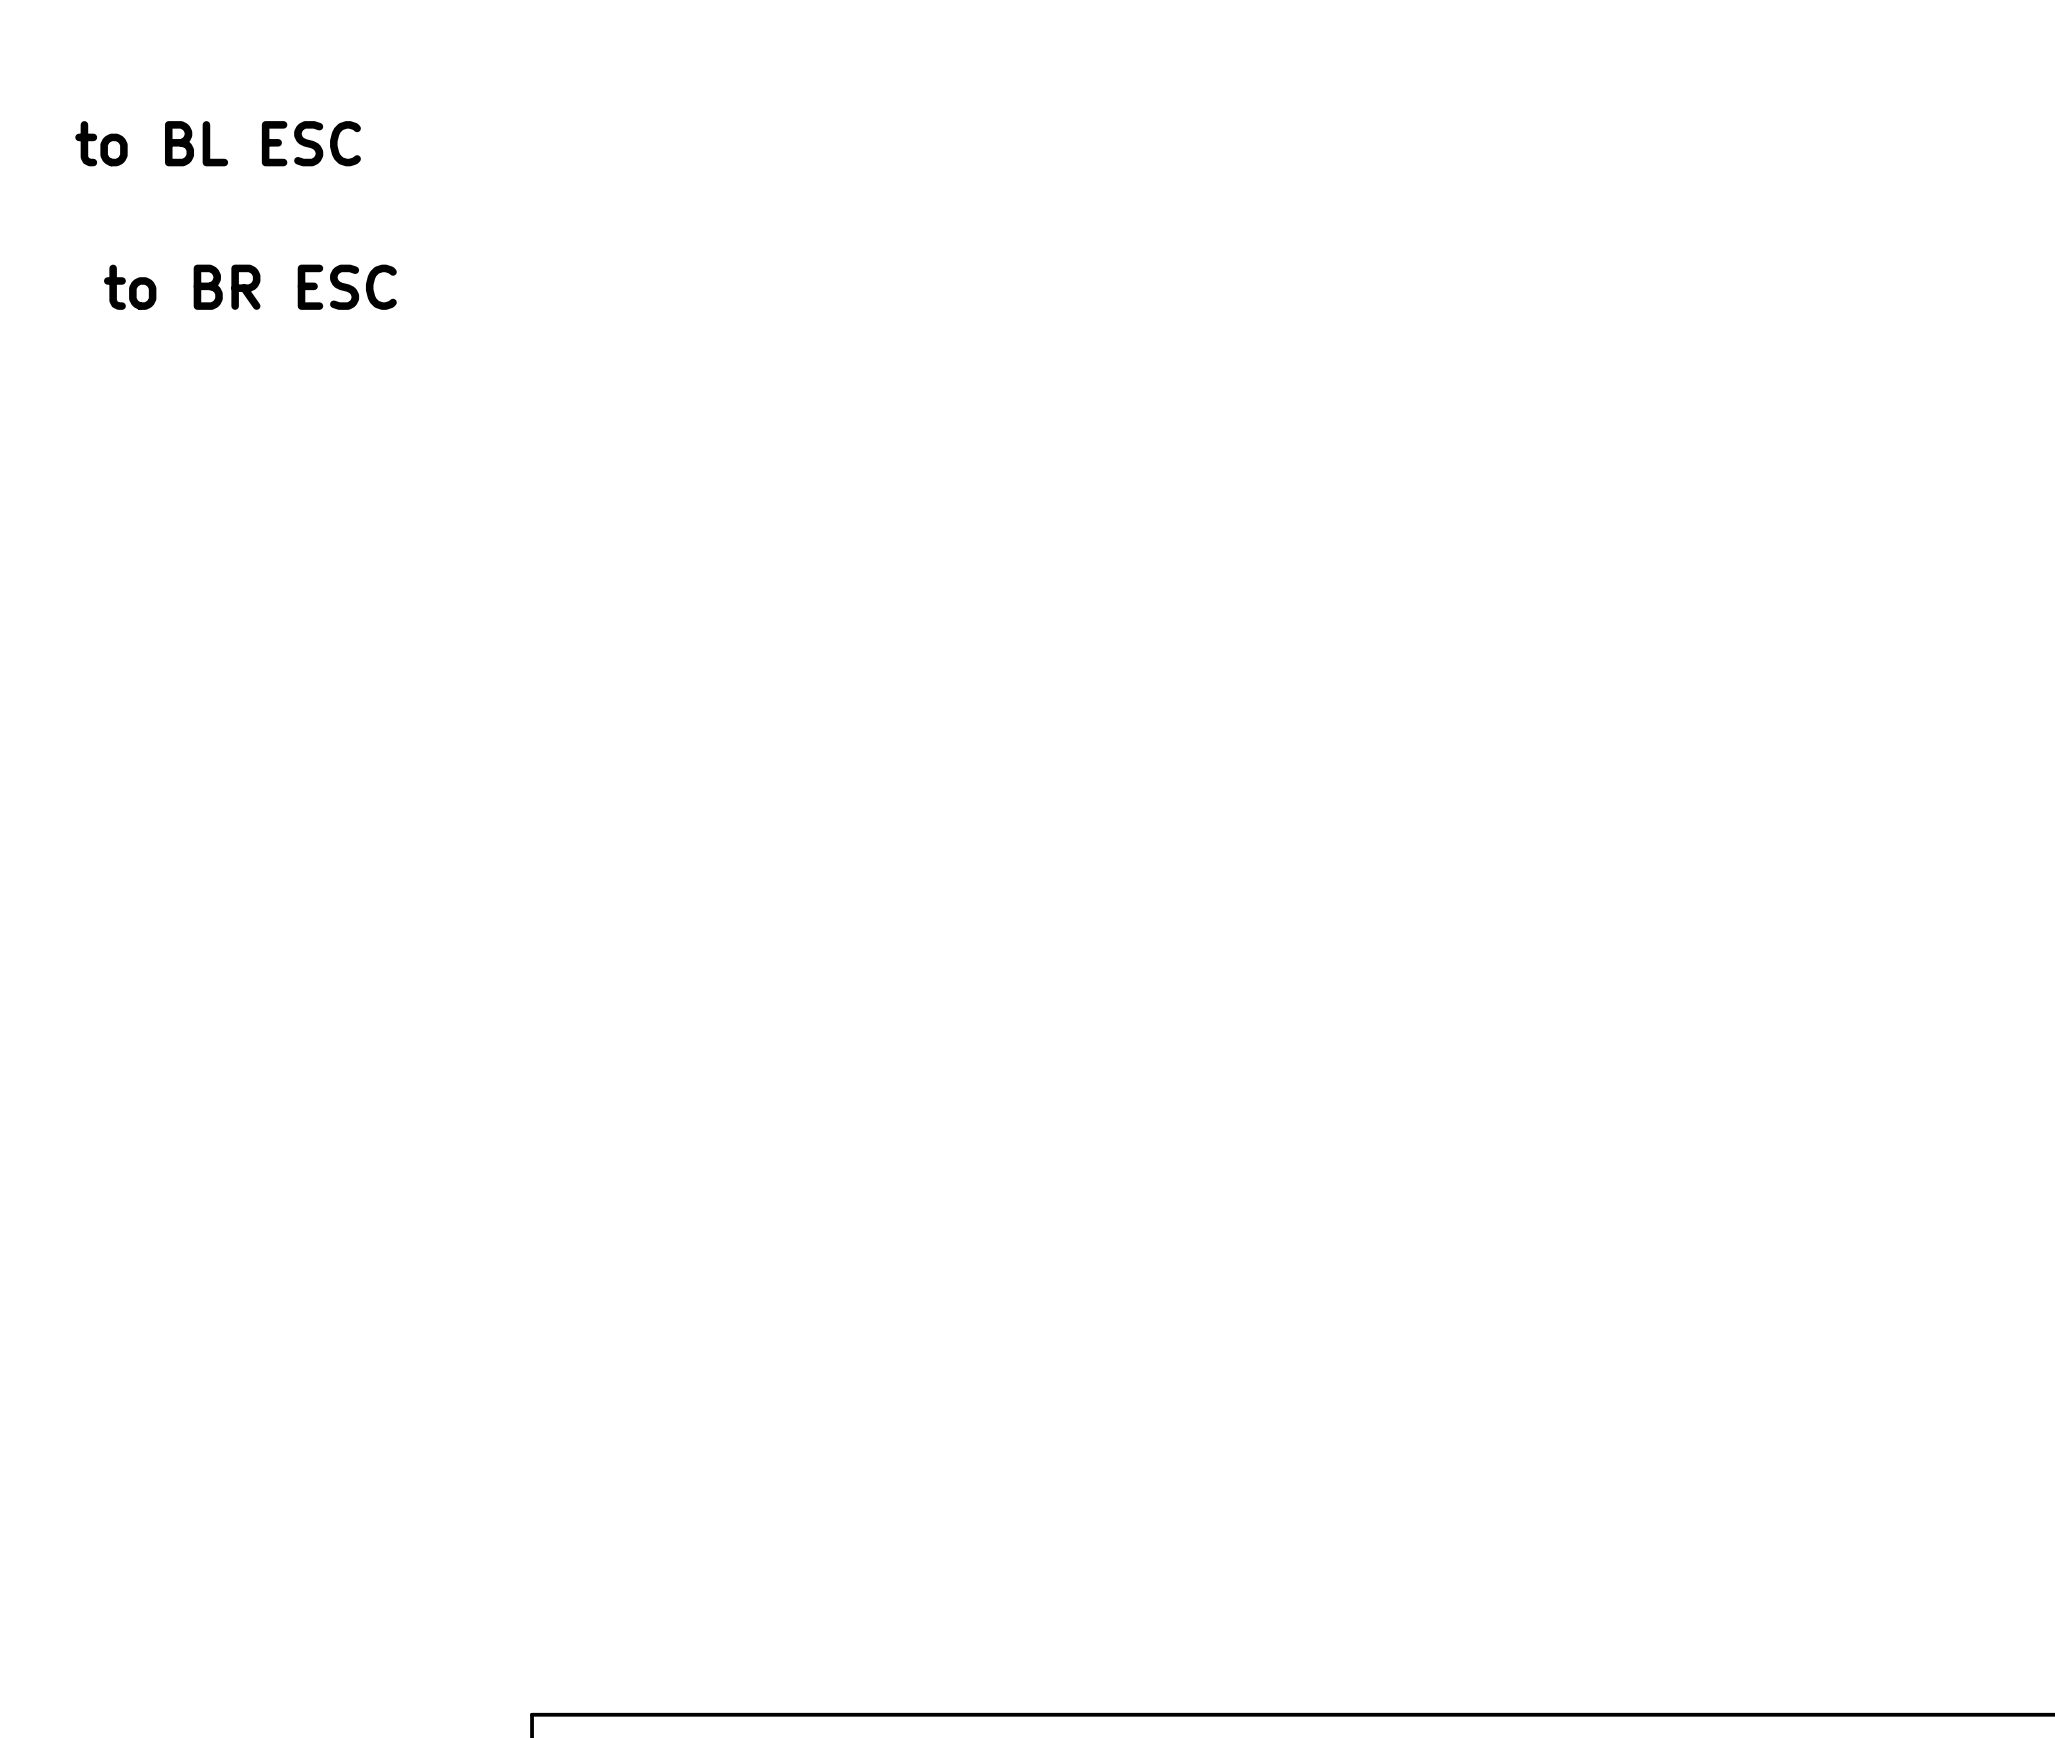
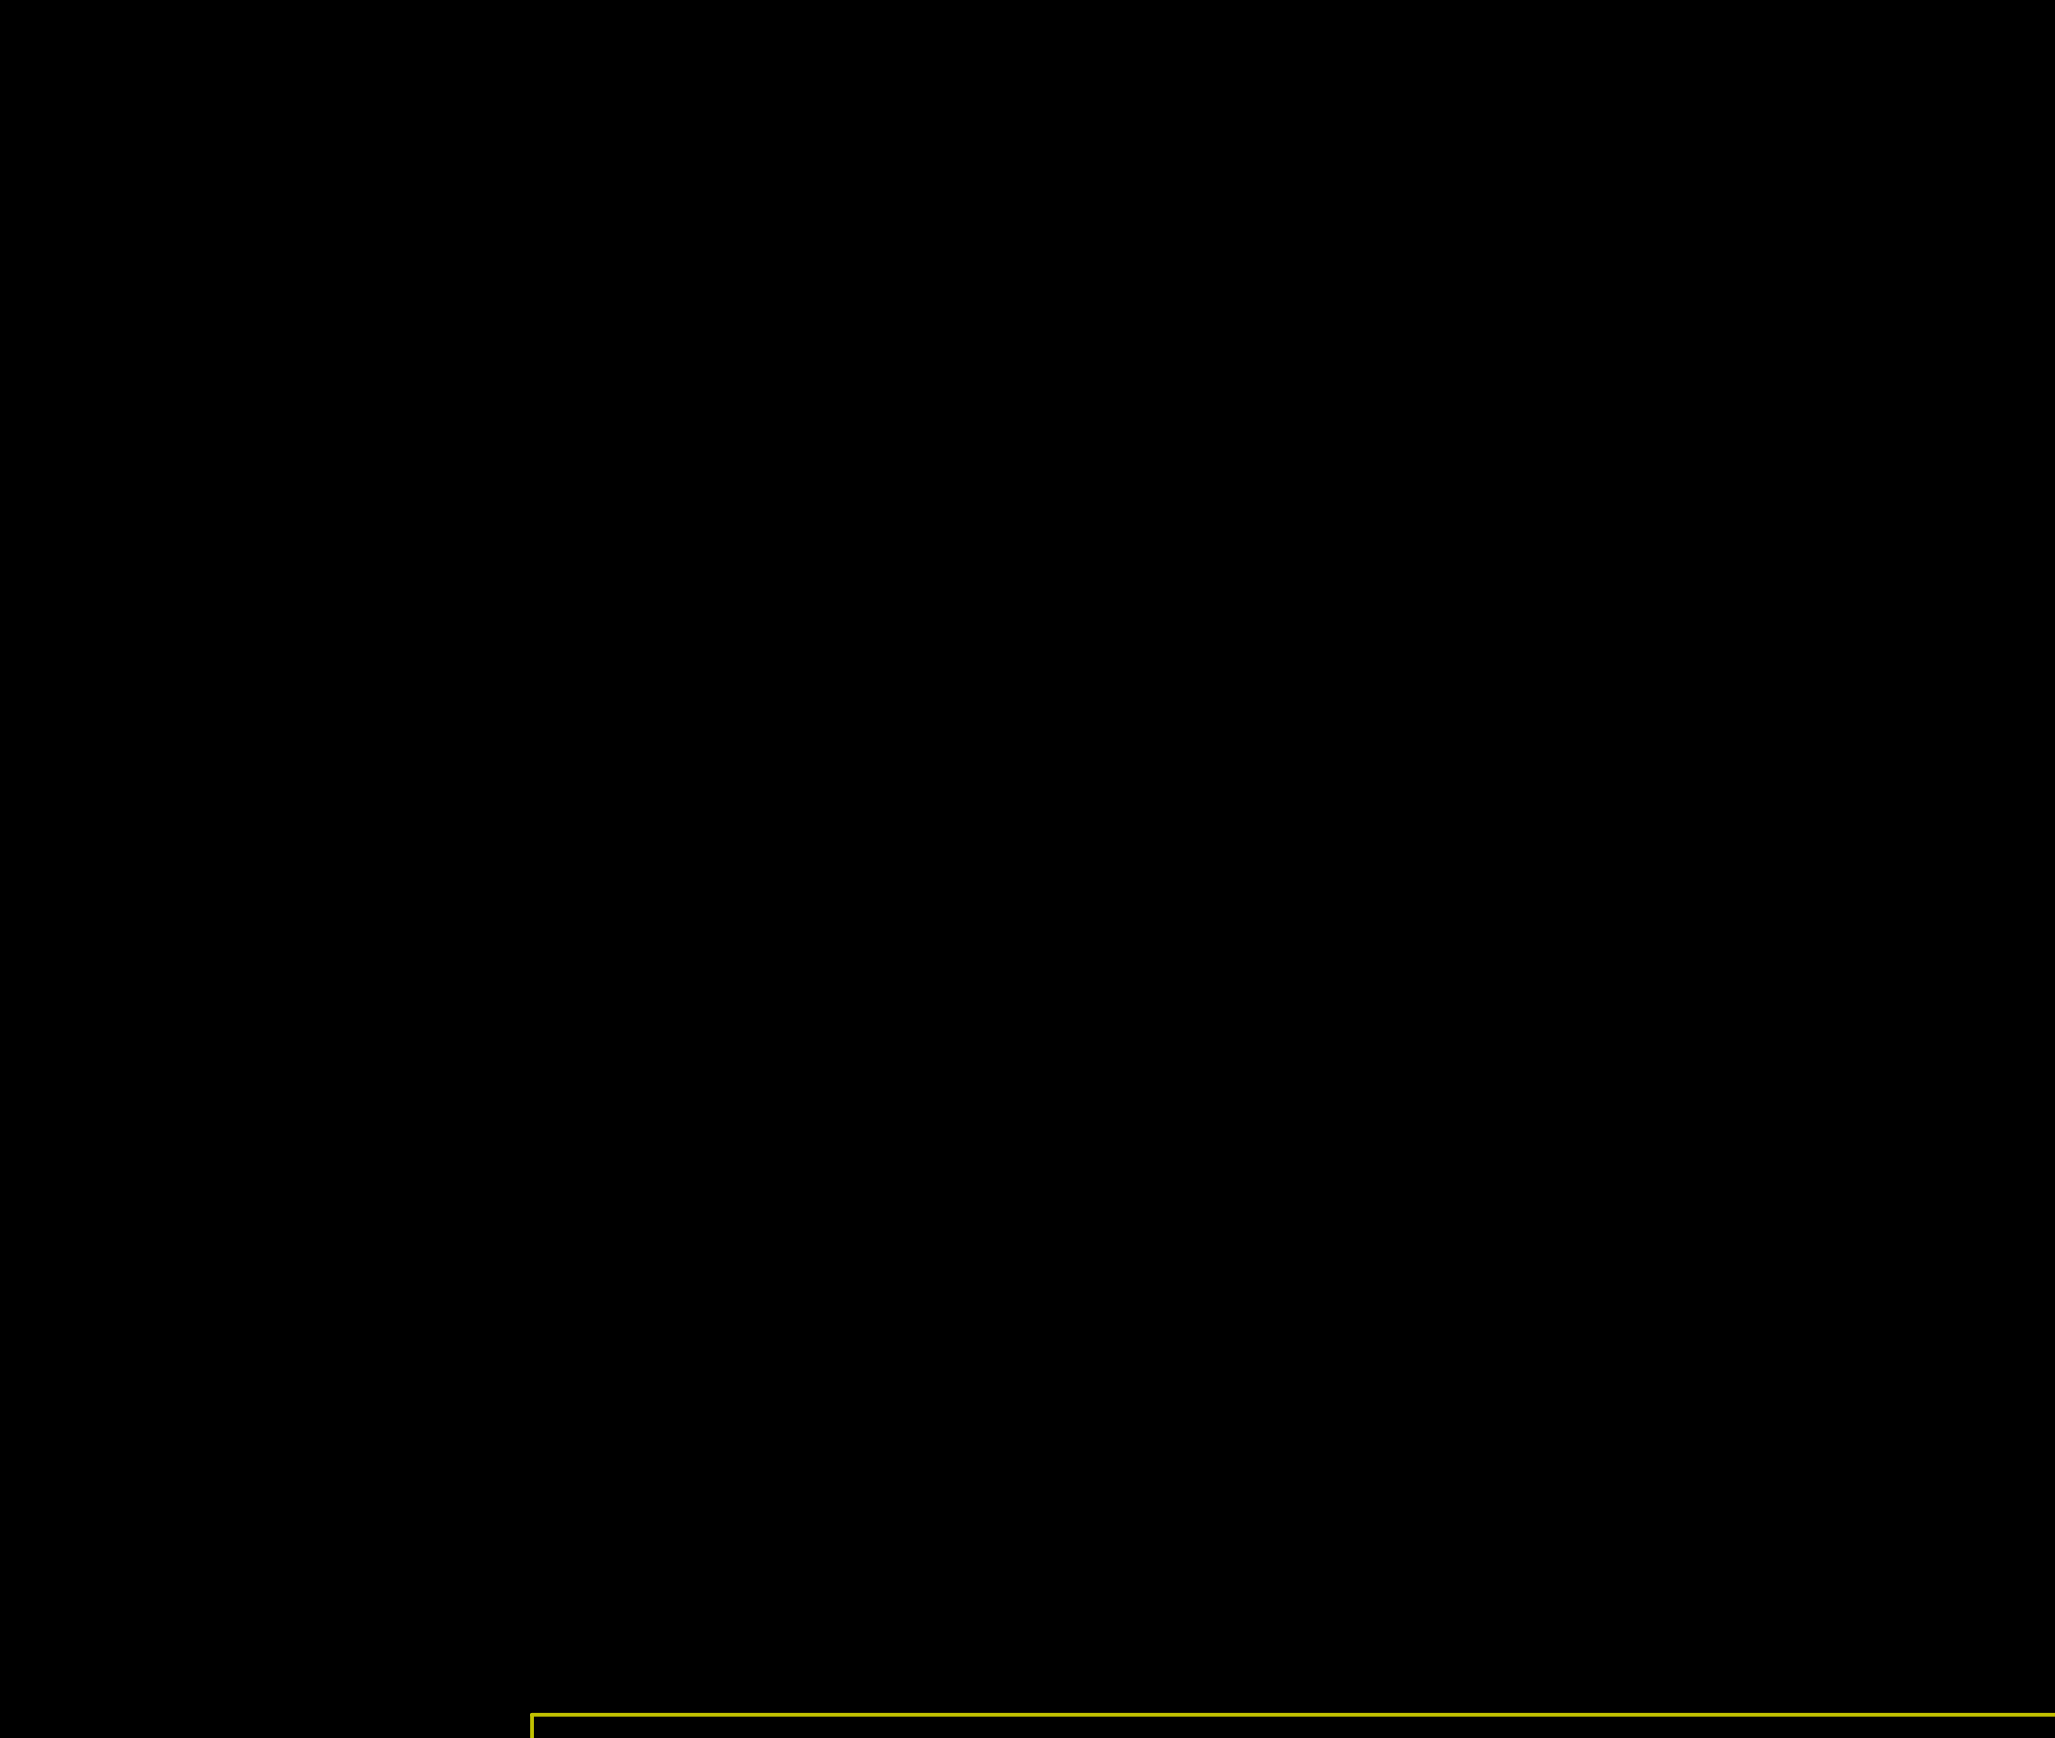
text: to BL ESC (218, 143) -> none
text: to BR ESC (250, 287) -> none

